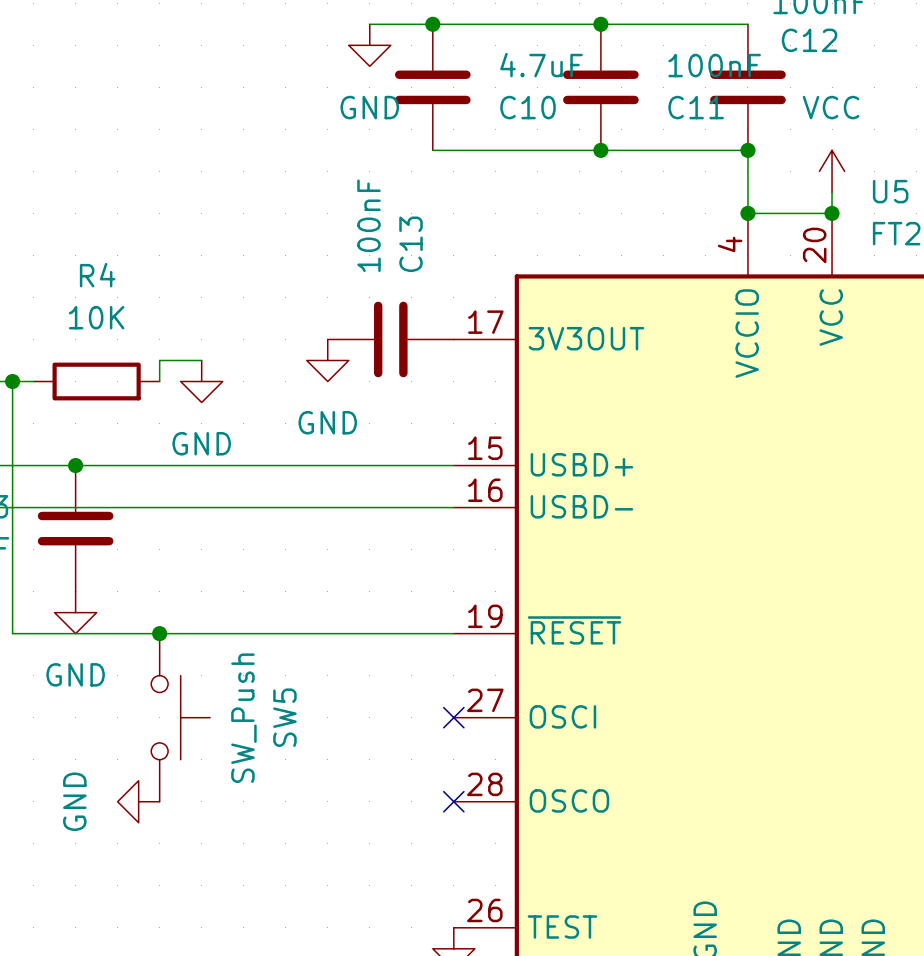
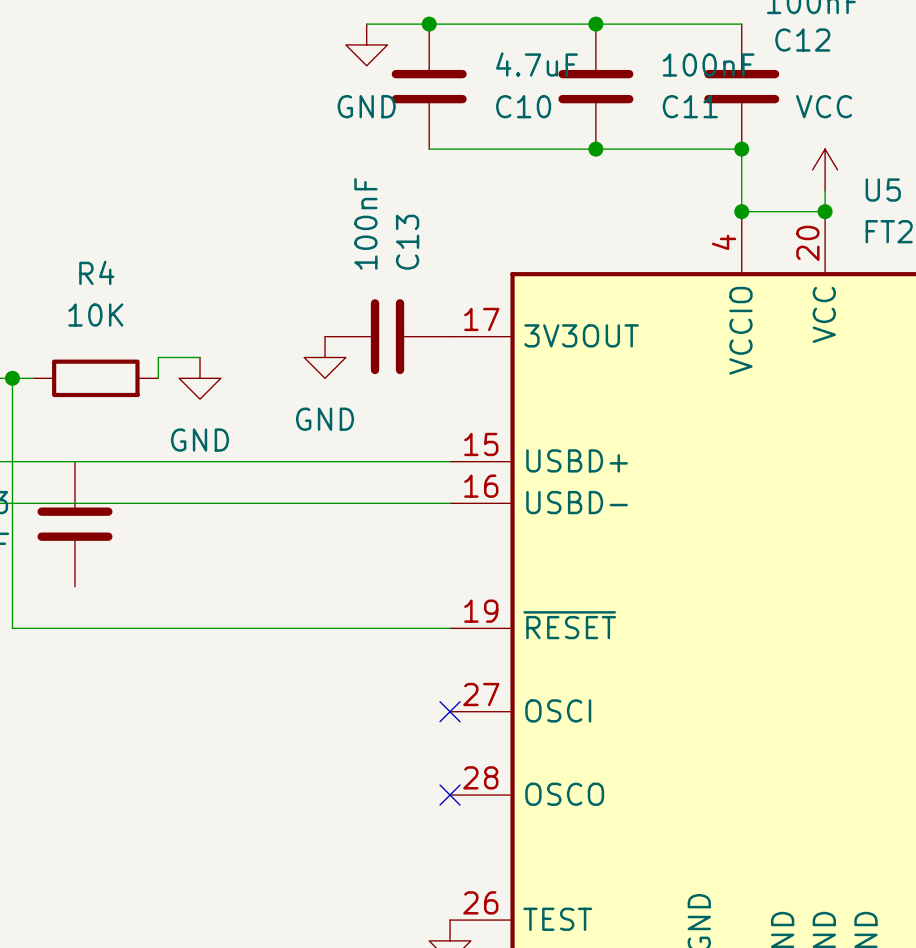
junction: (75, 465) -> none
power symbol: GND (75, 612) -> none
junction: (159, 633) -> none
SW5: SW_Push (180, 717) -> none
power symbol: GND (138, 801) -> none

